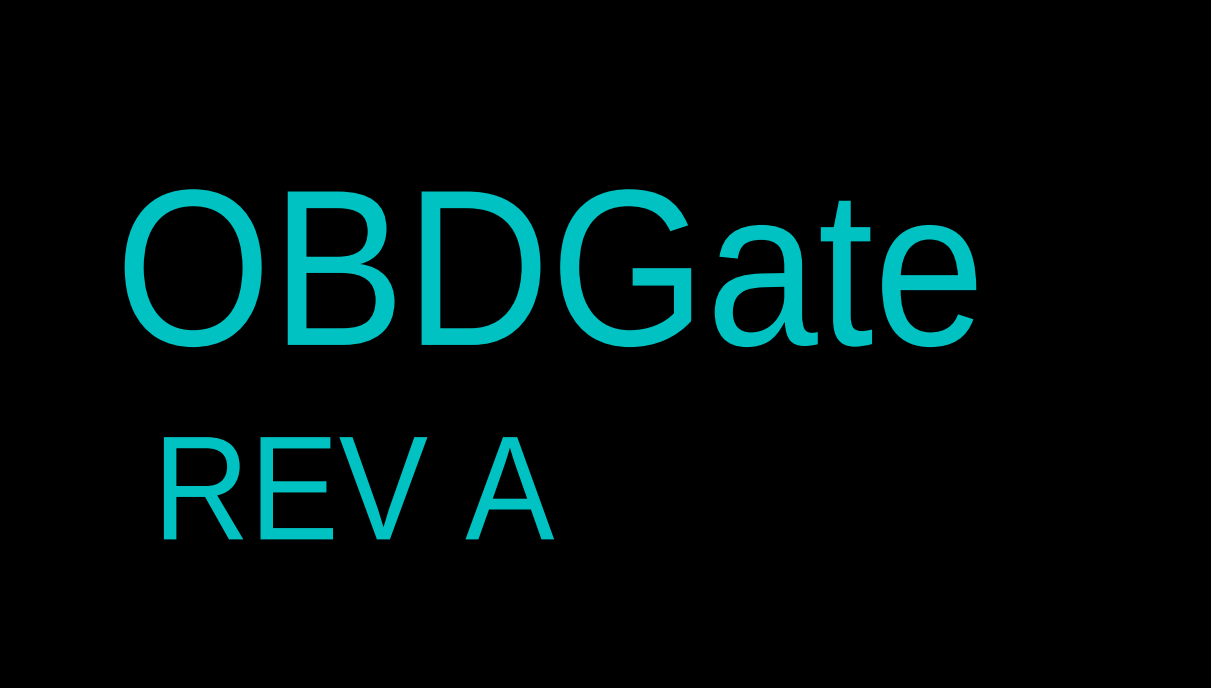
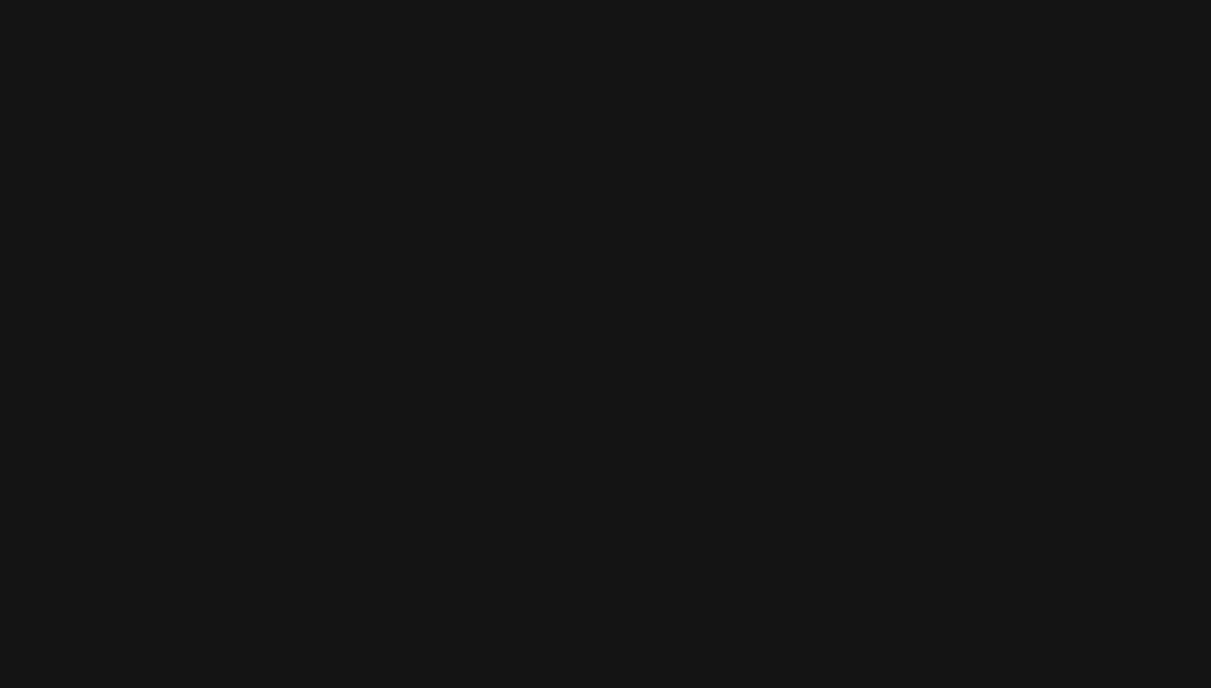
text: OBDGate (550, 268) -> none
text: REV A (359, 488) -> none

